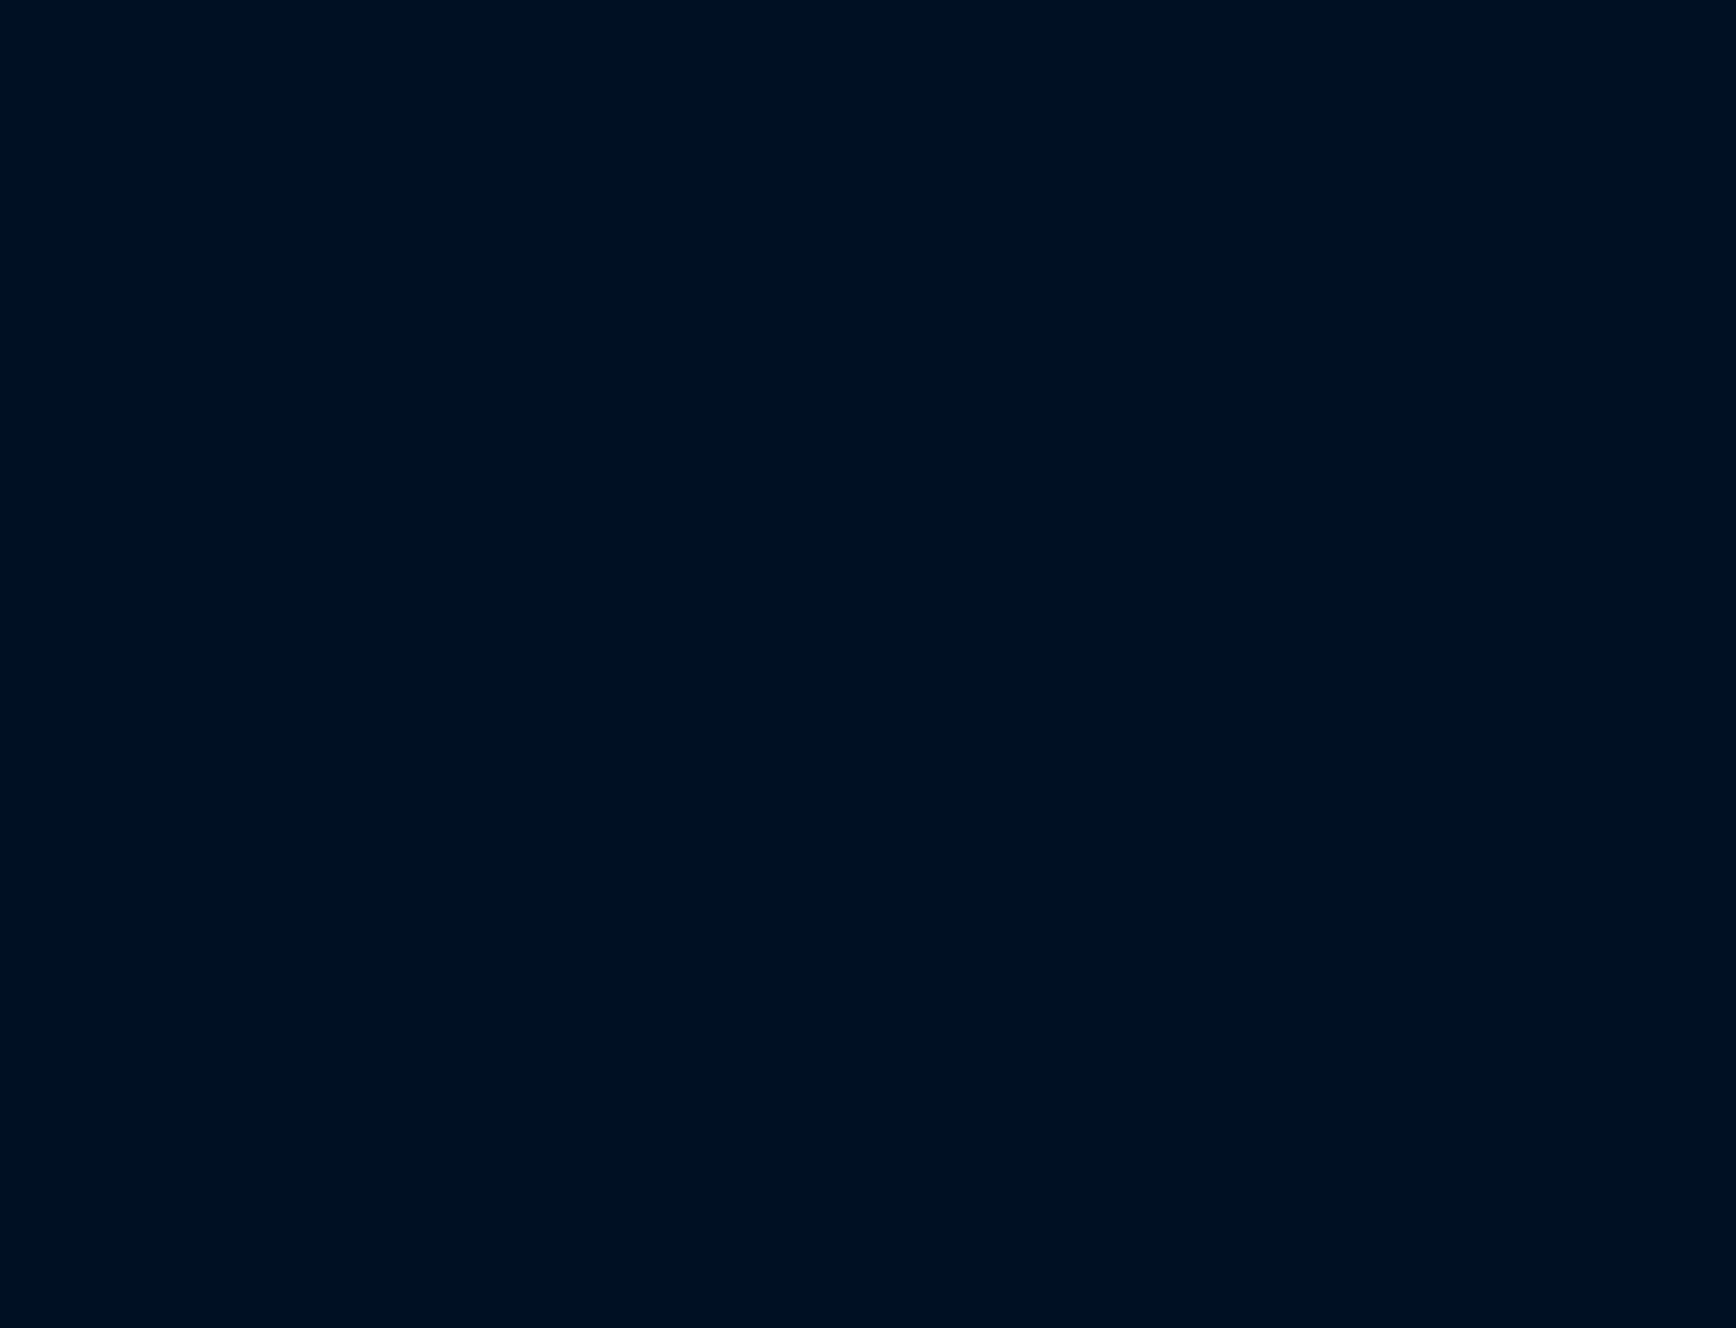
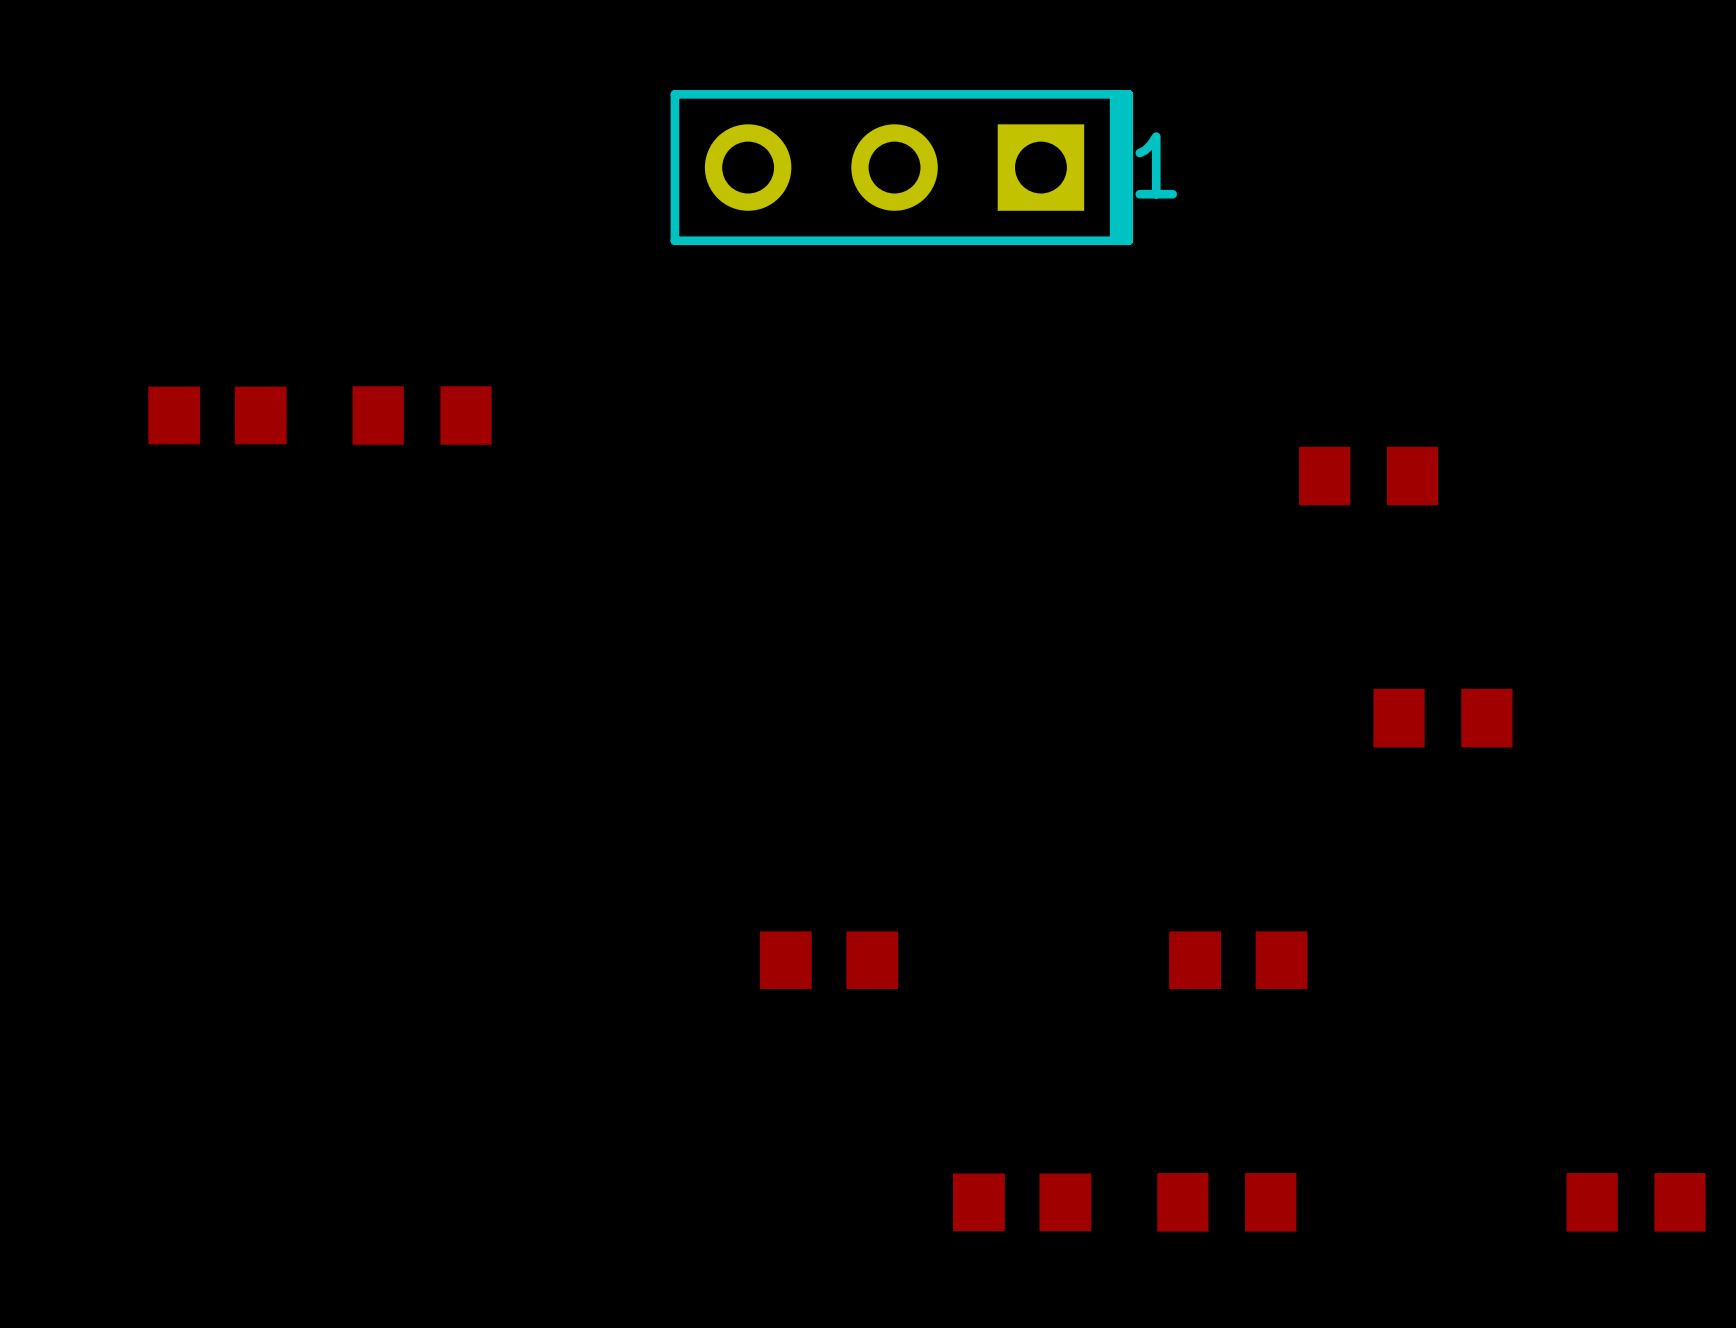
part: none -> (901, 167)
part: none -> (217, 415)
part: none -> (422, 415)
part: none -> (1368, 476)
part: none -> (1442, 718)
part: none -> (829, 960)
part: none -> (1238, 960)
part: none -> (1022, 1202)
part: none -> (1226, 1202)
part: none -> (1636, 1202)

